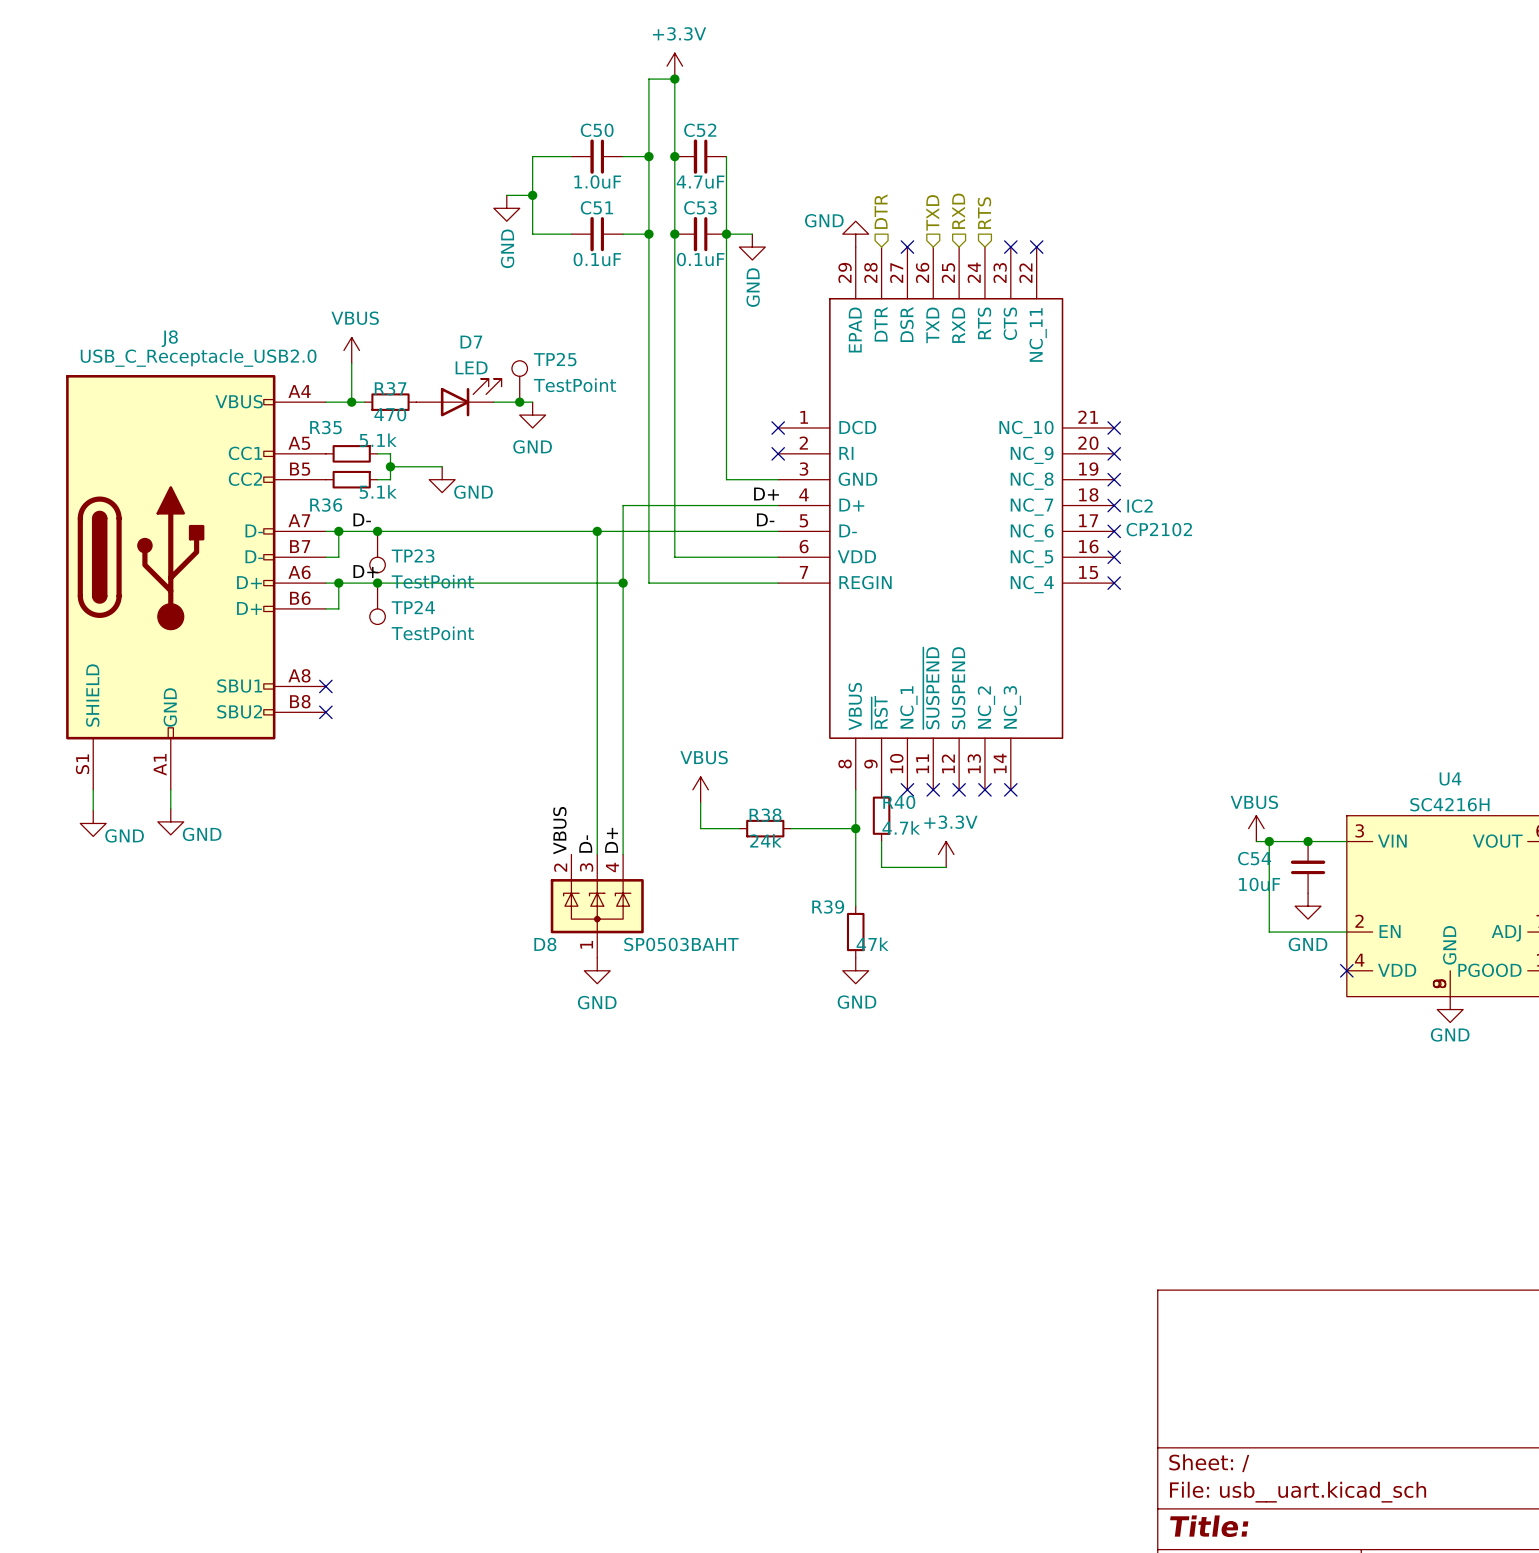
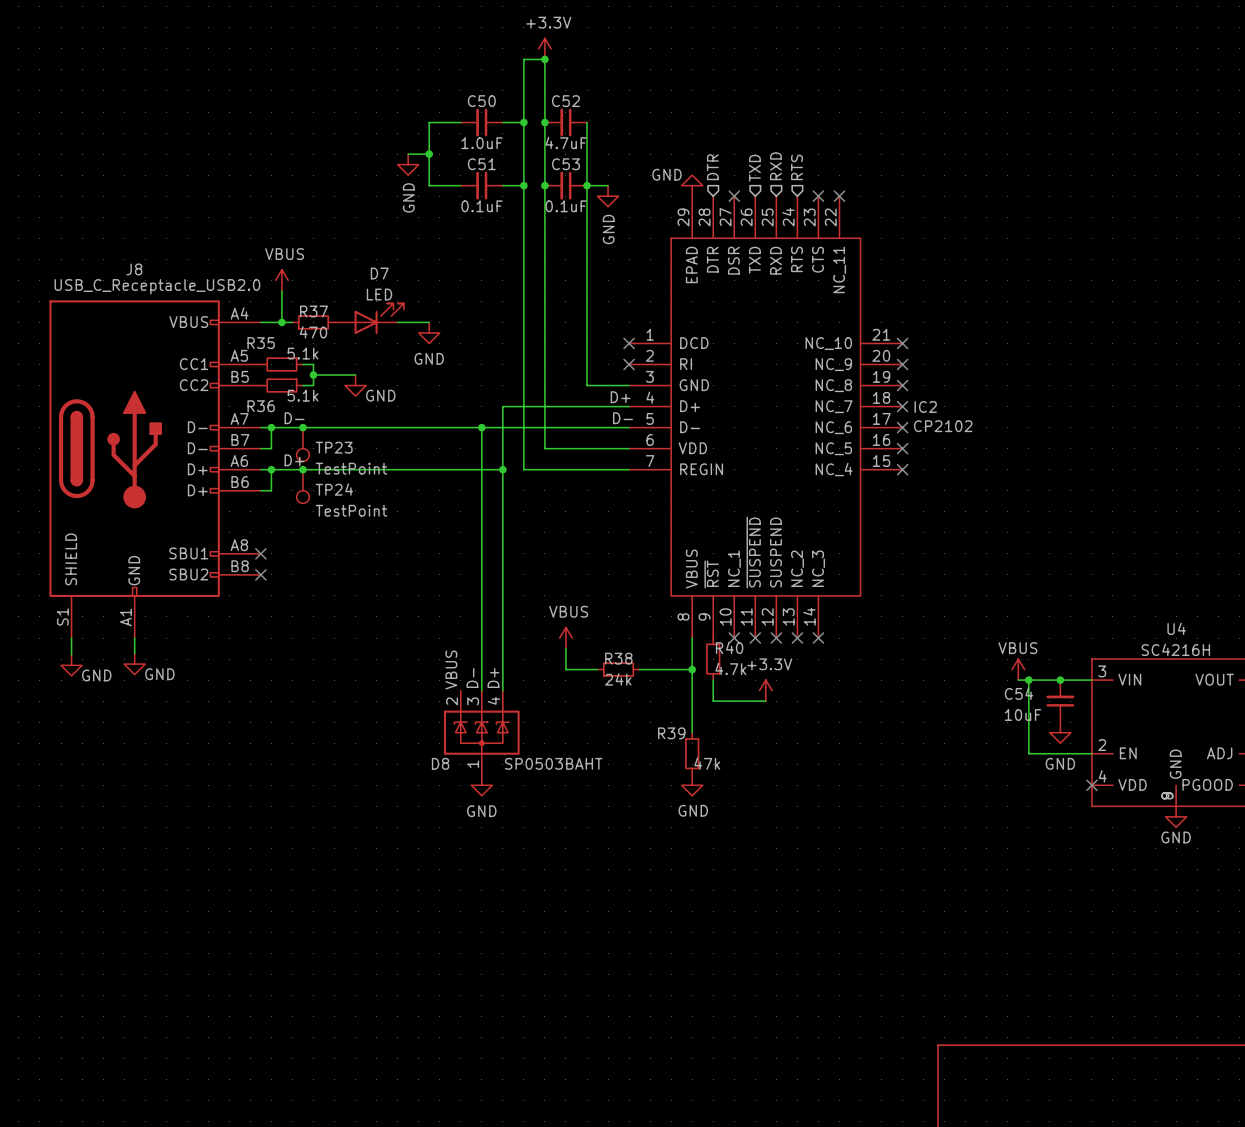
TP25: TestPoint (519, 381) -> none
junction: (519, 402) -> none

